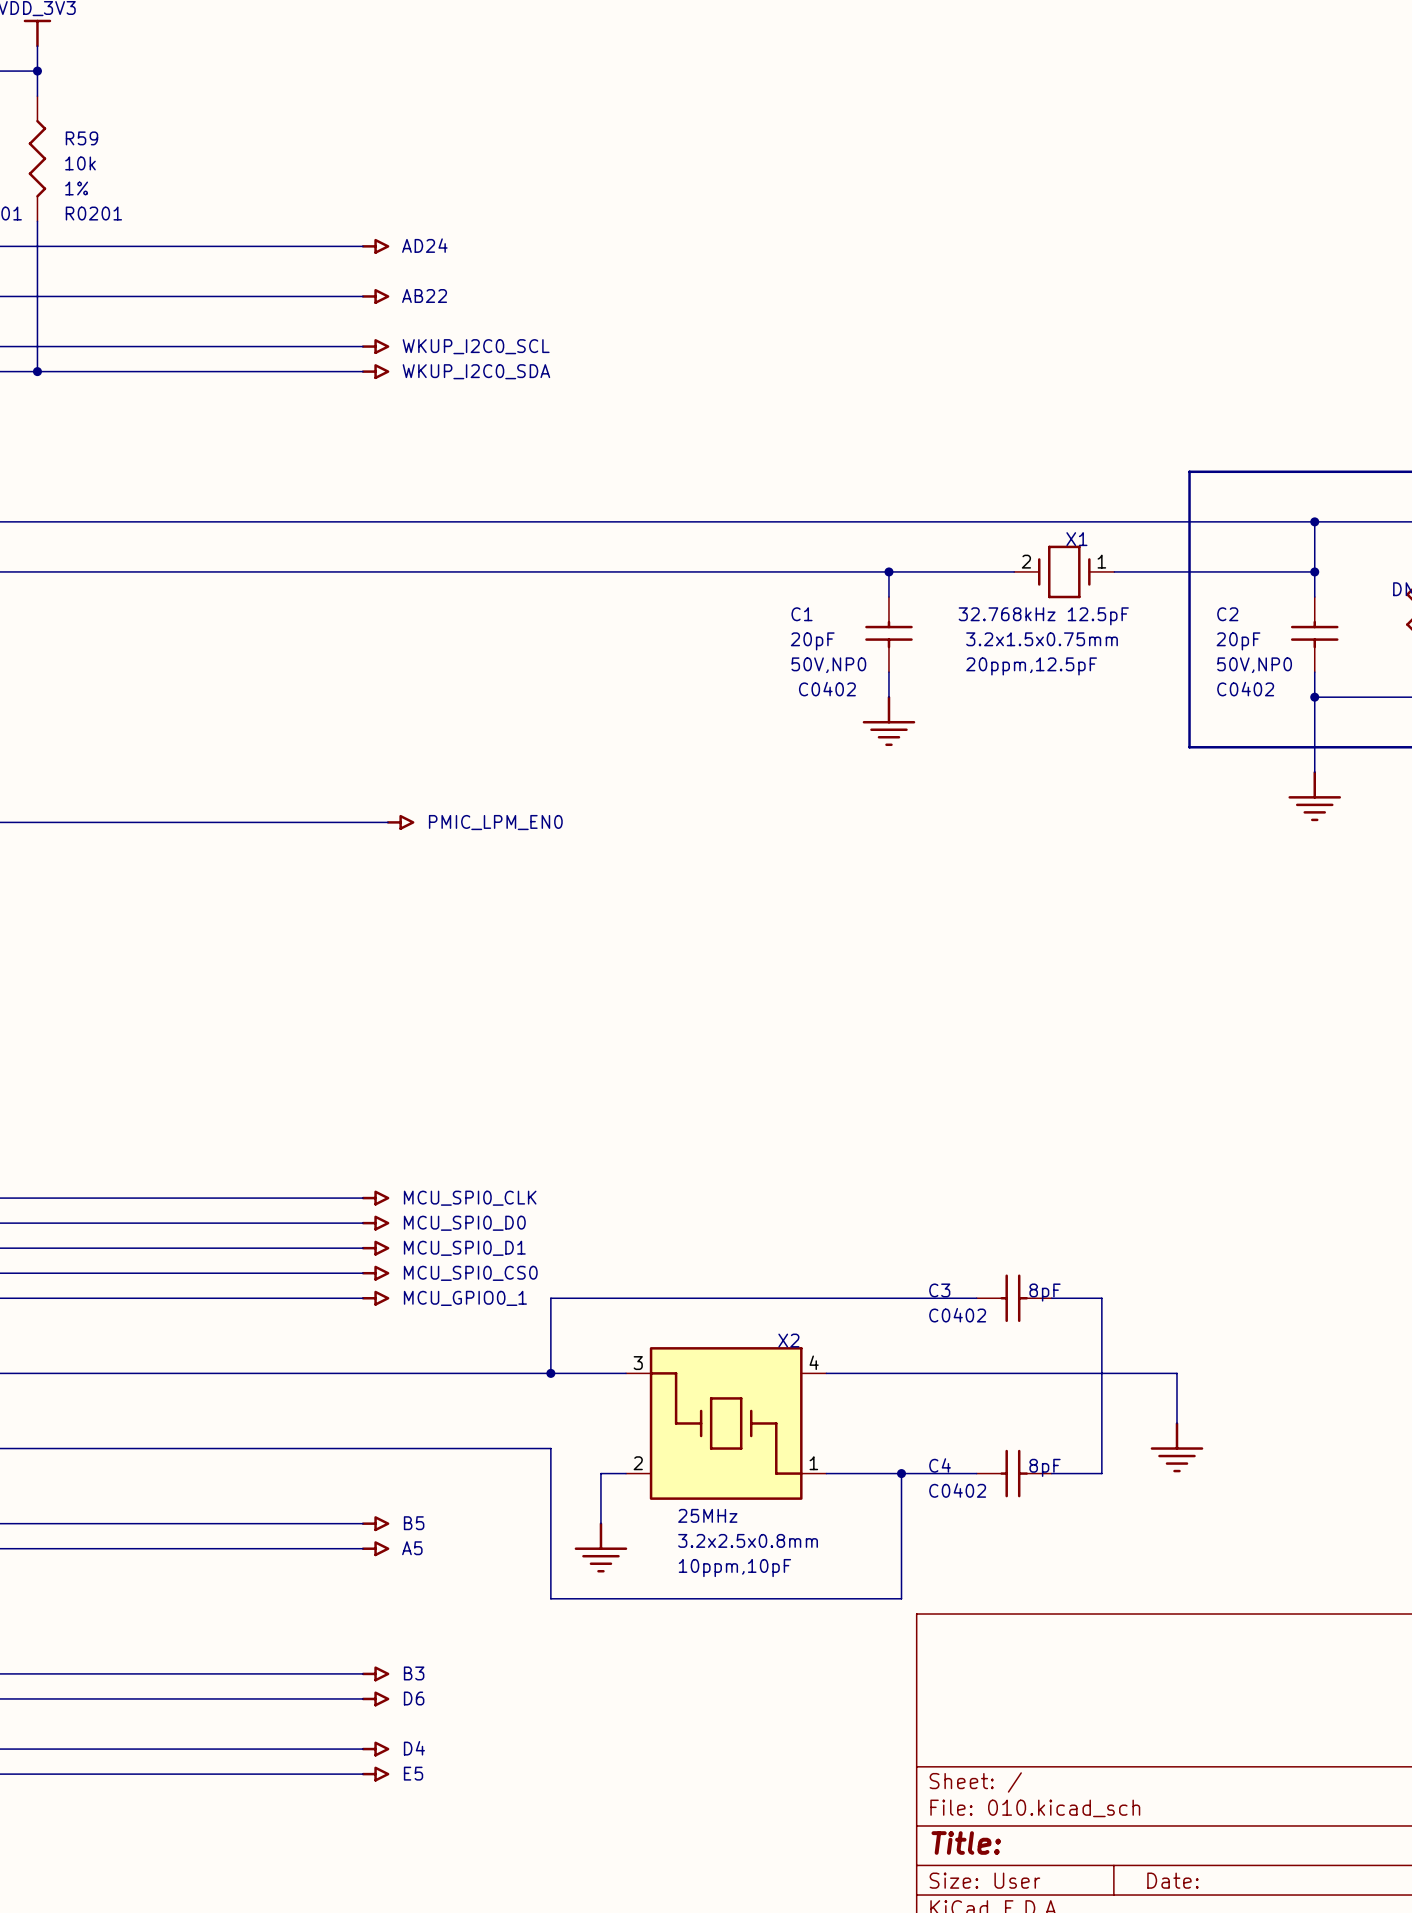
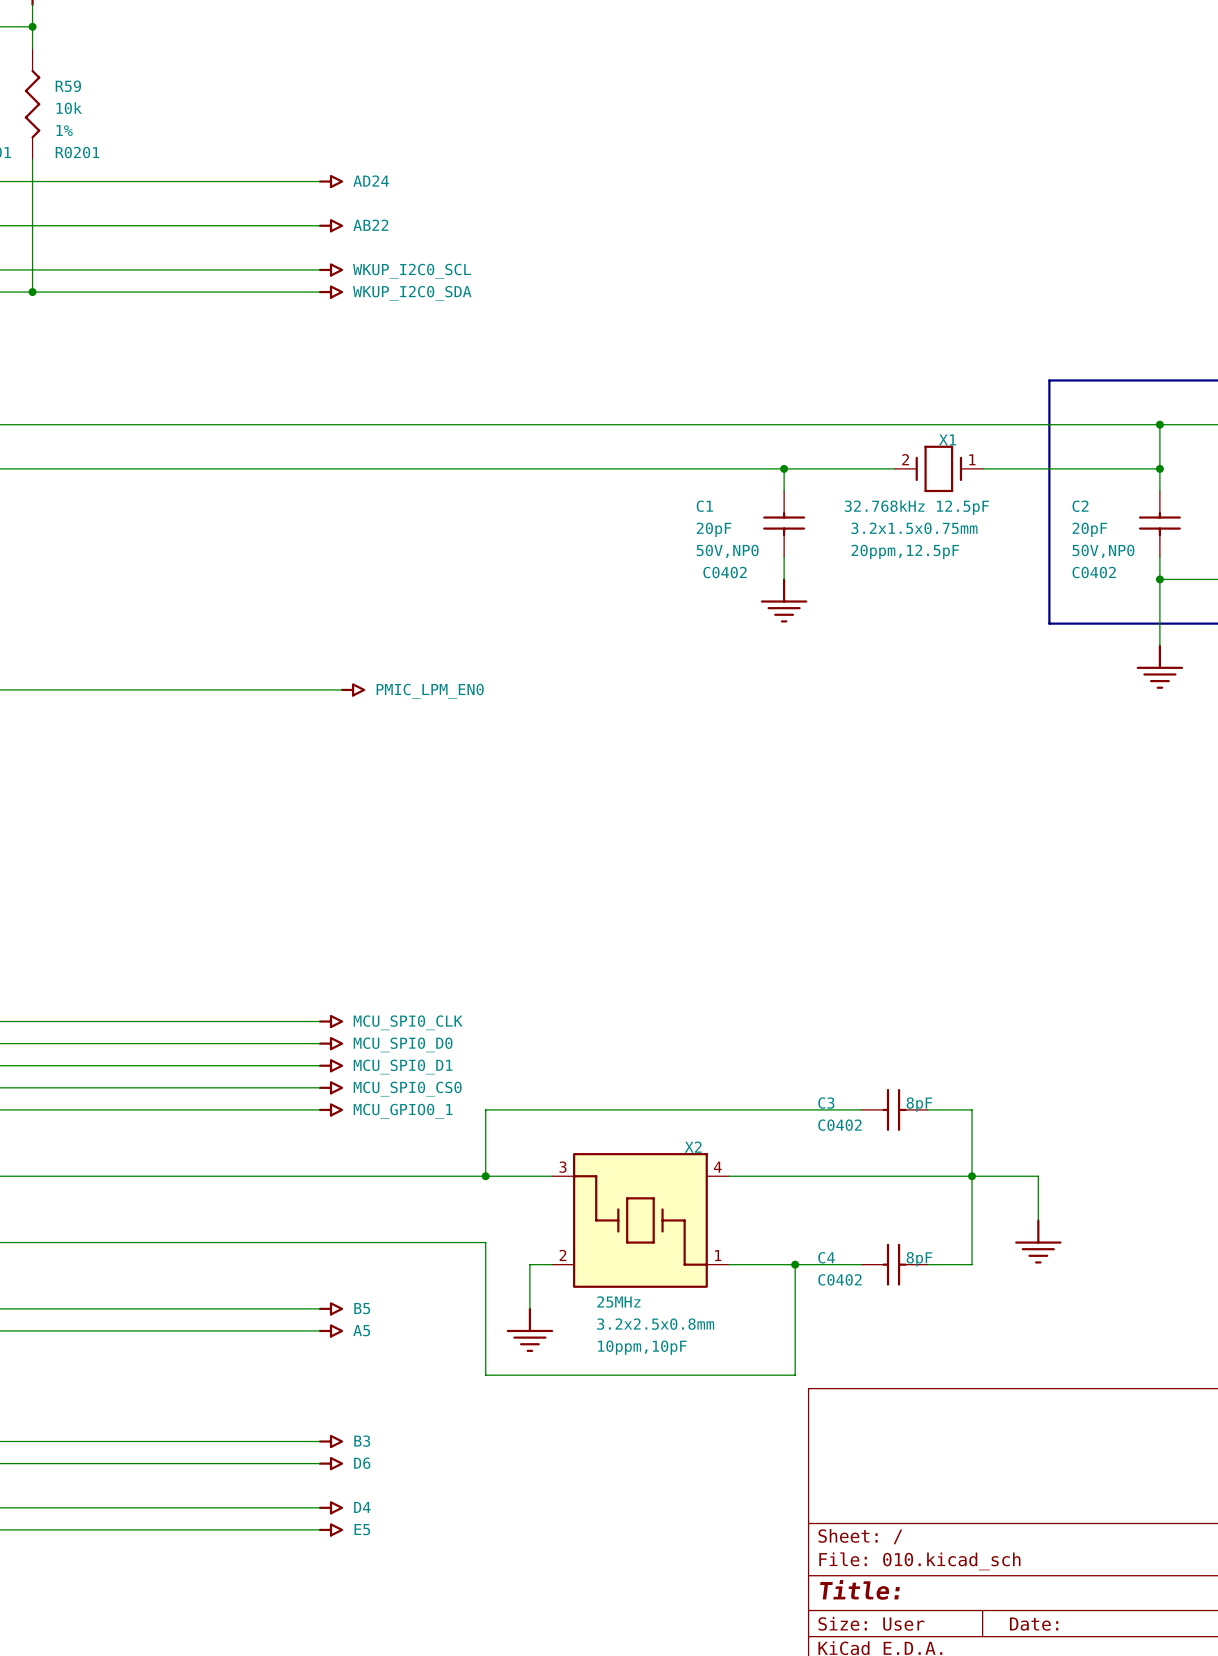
junction: none -> (972, 1176)

